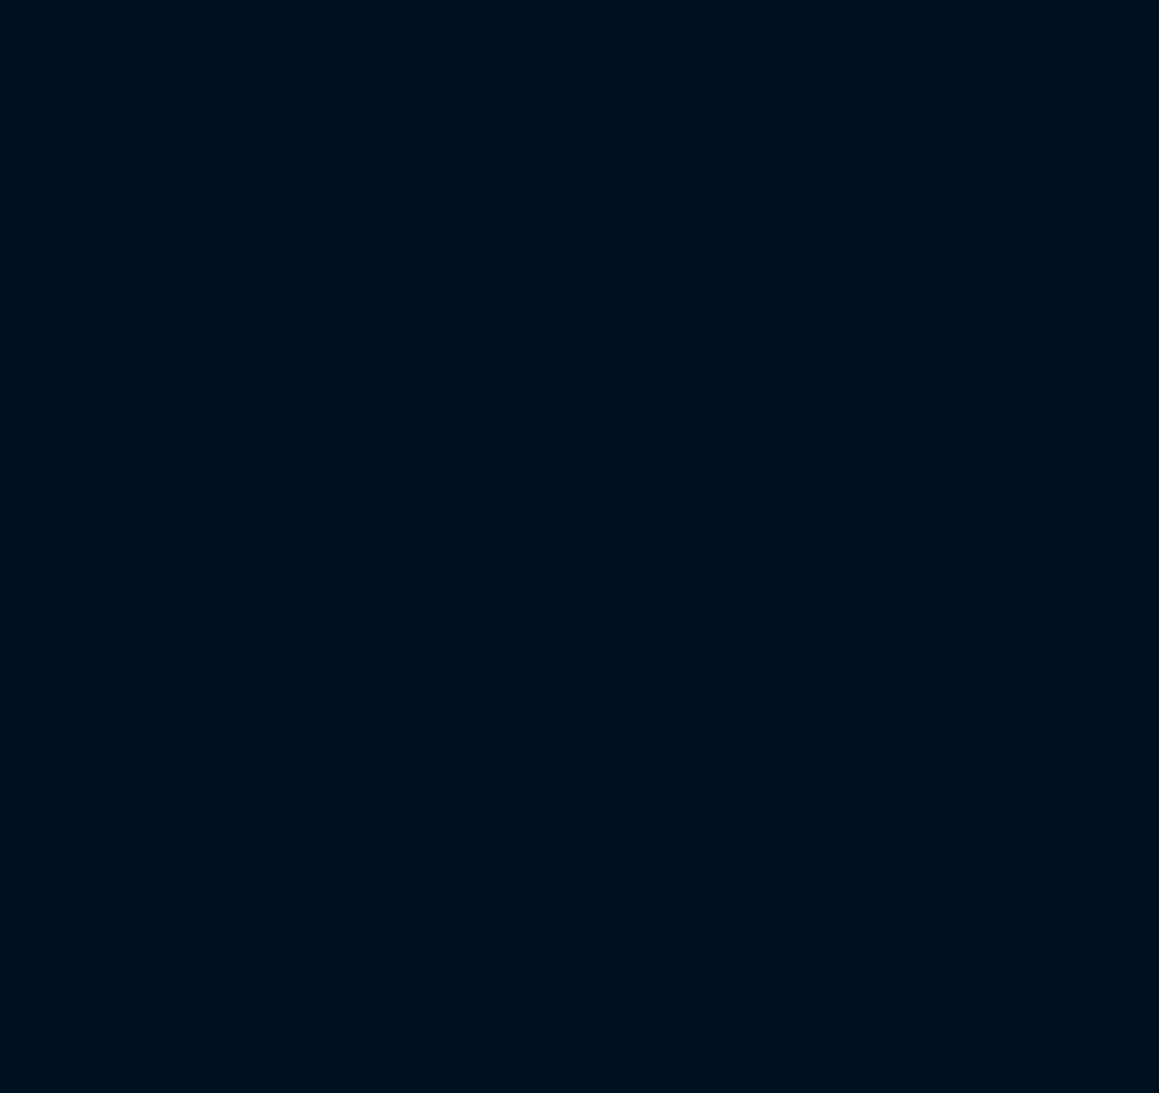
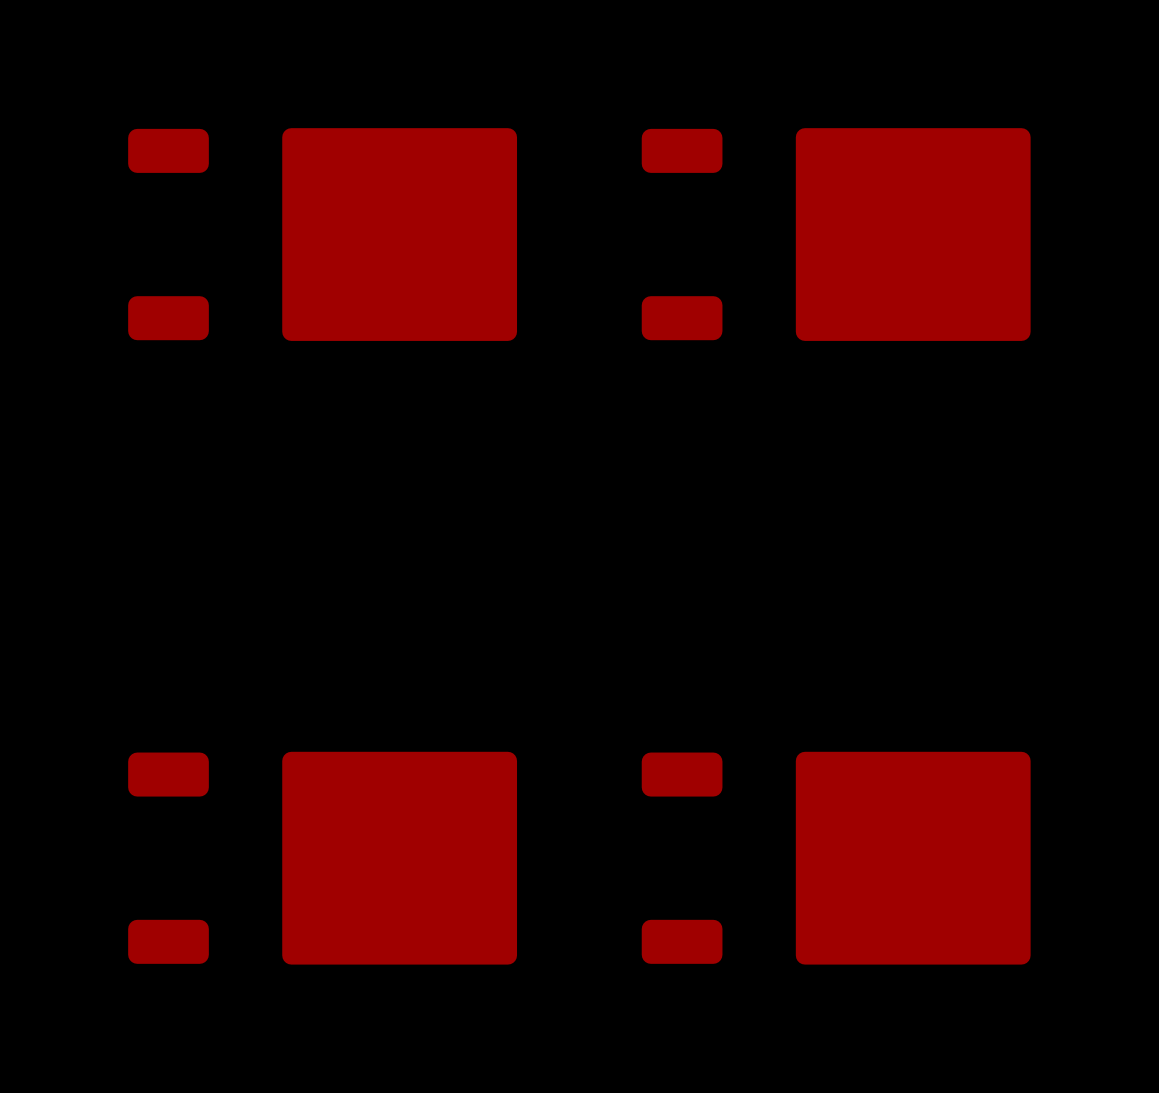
part: none -> (322, 234)
part: none -> (836, 234)
part: none -> (322, 858)
part: none -> (836, 858)

